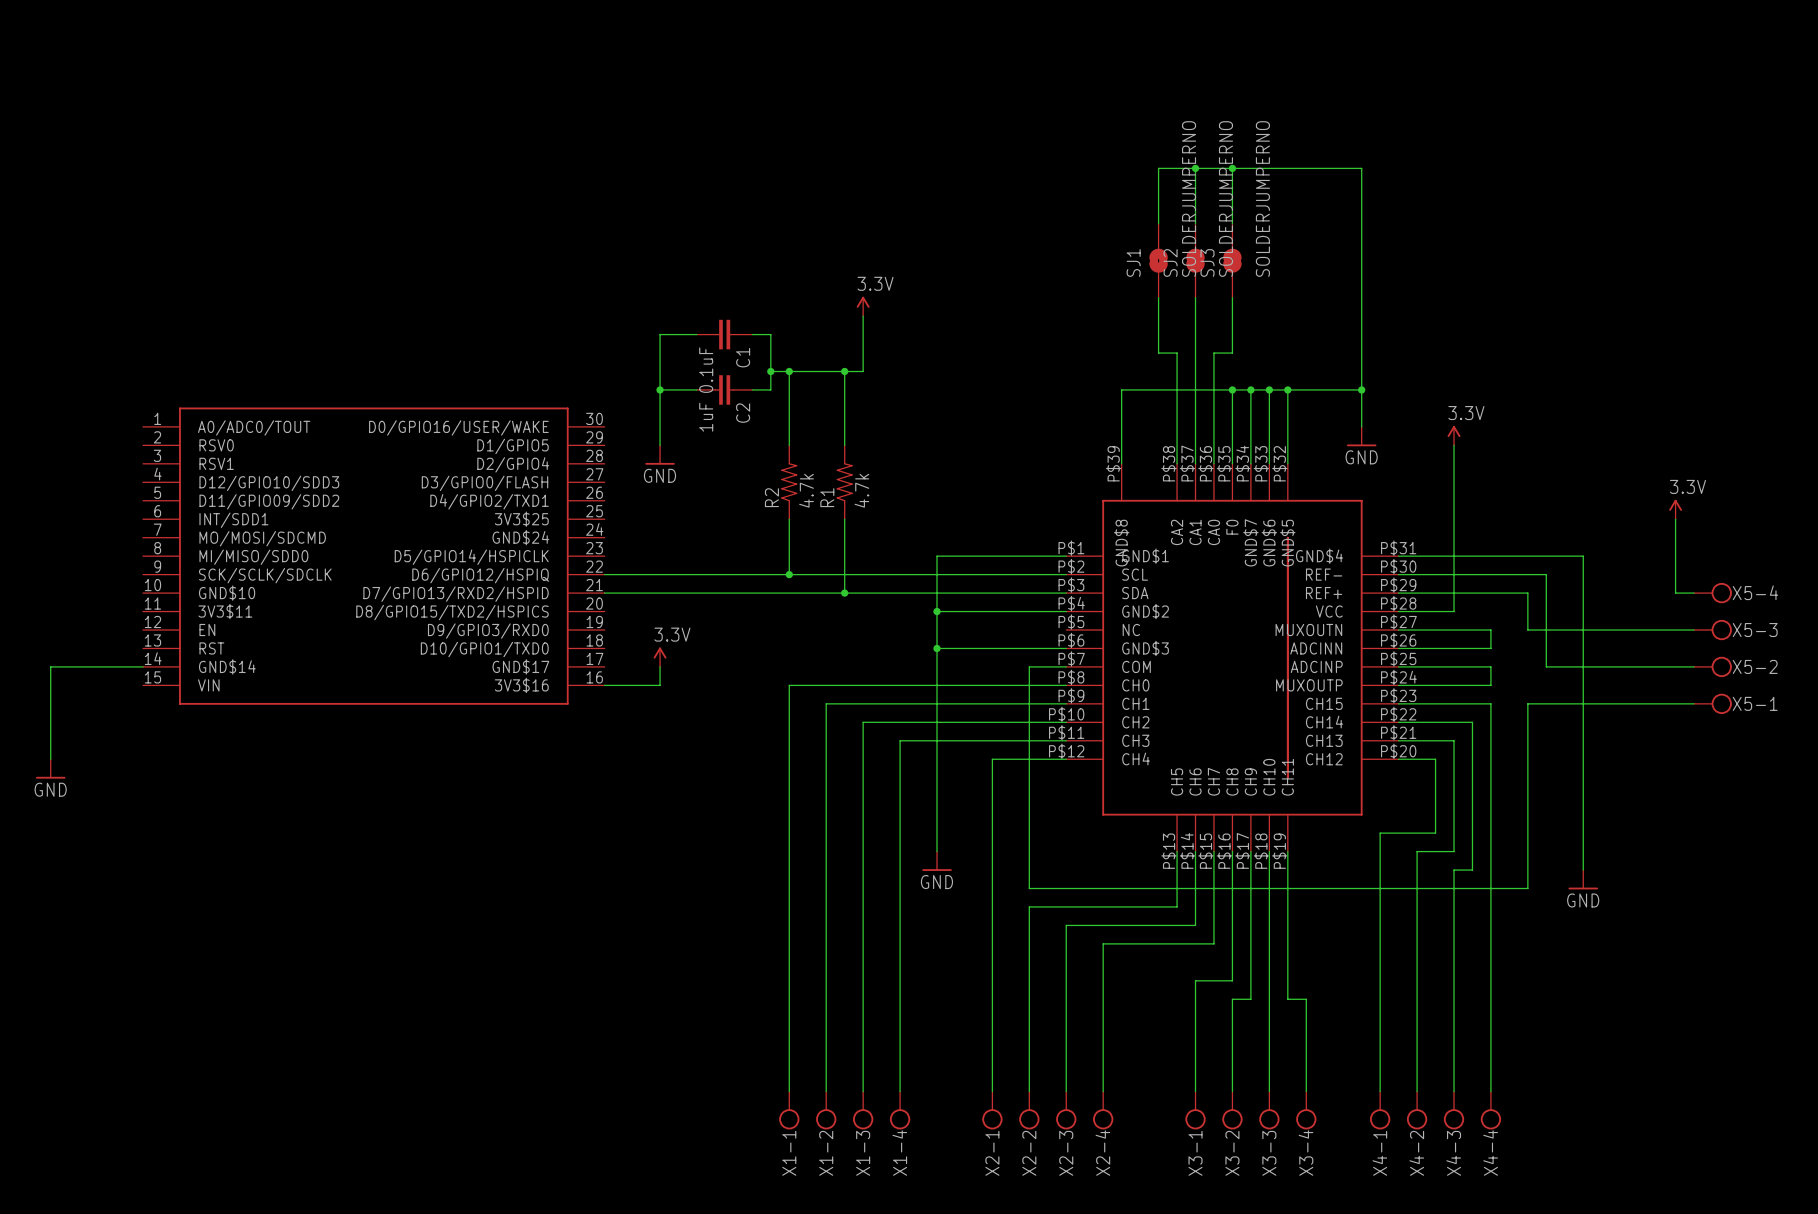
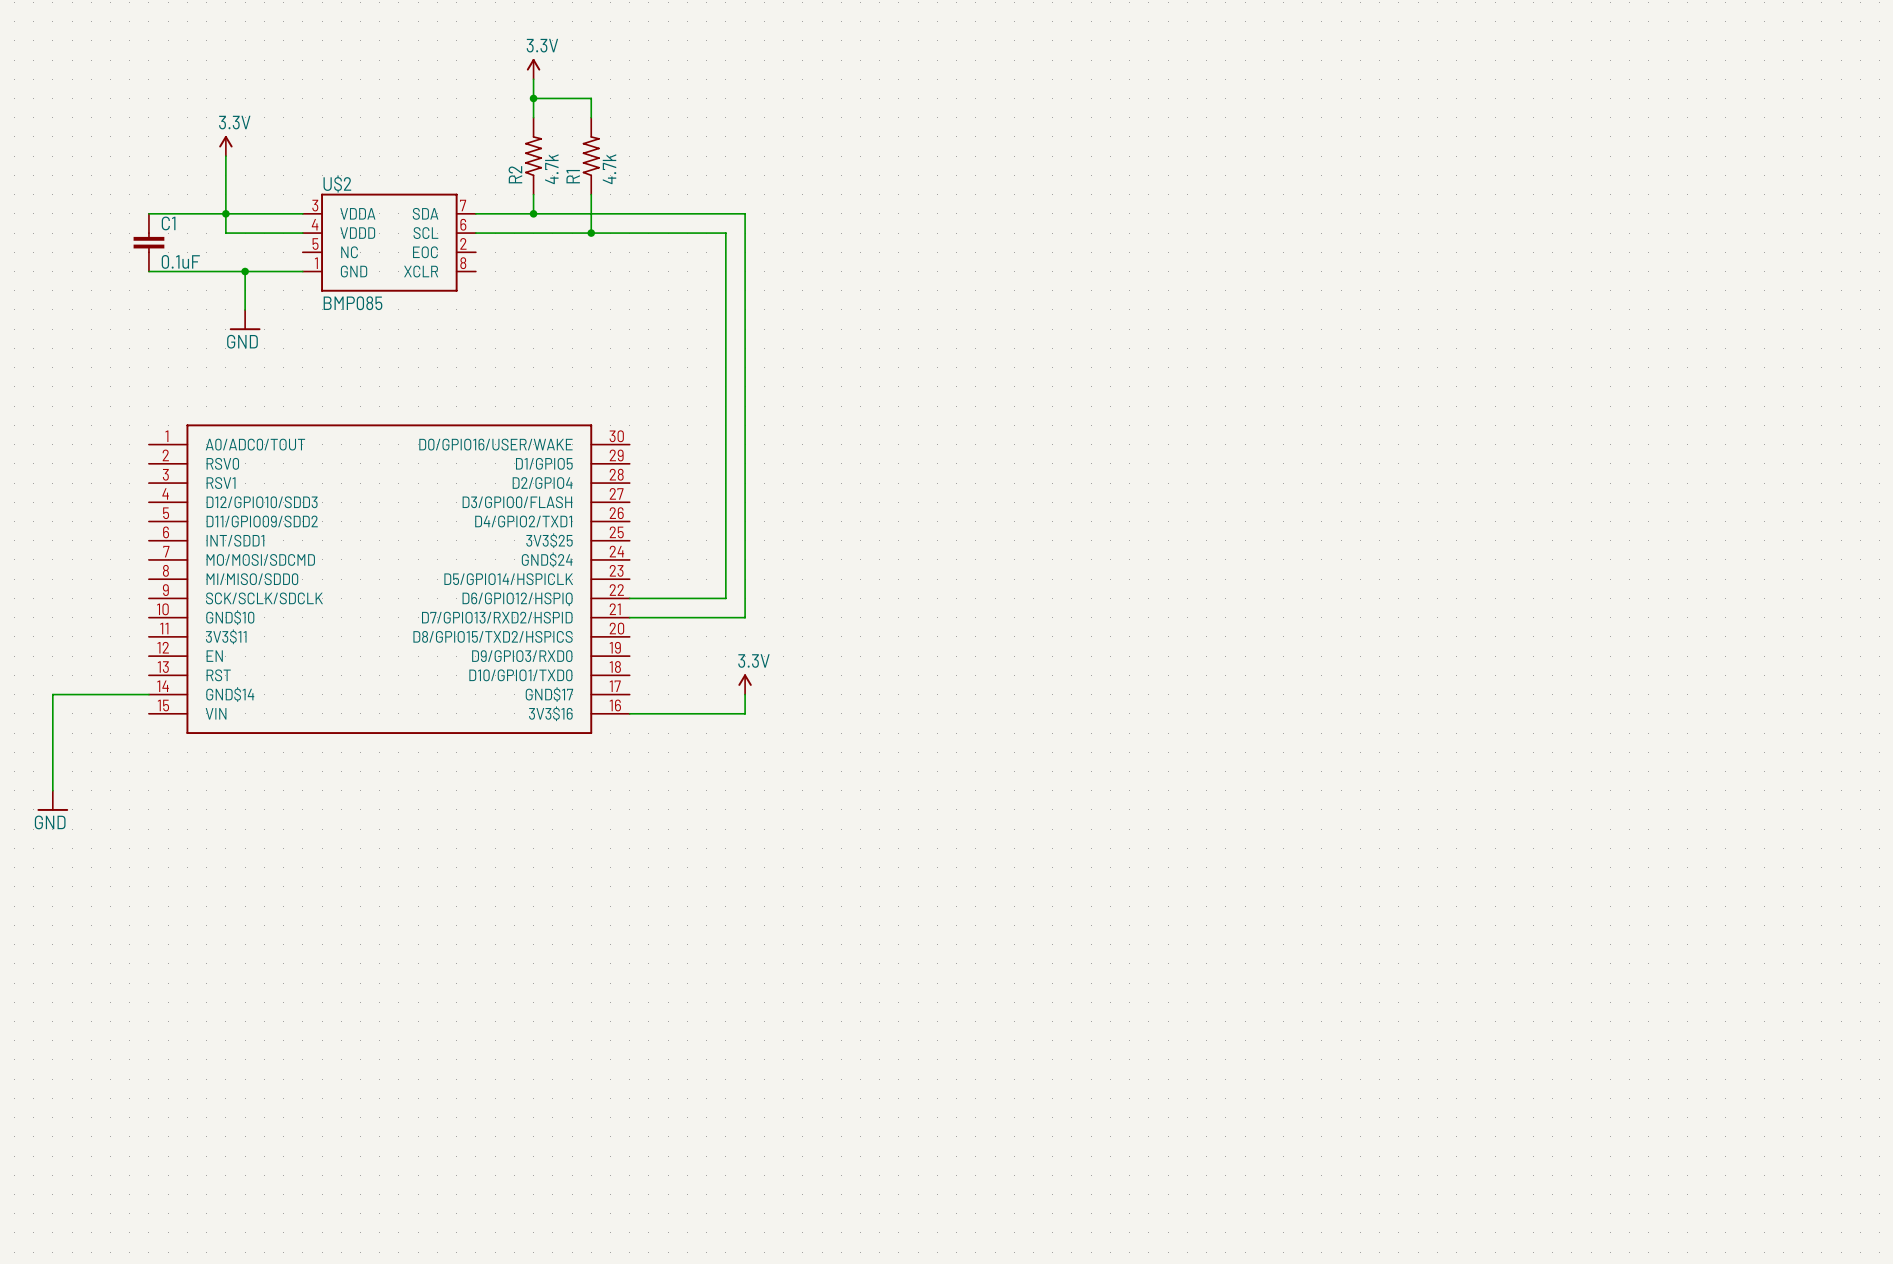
power symbol: none -> 3.3V (533, 69)
wire: none -> (533, 79) (533, 117)
wire: none -> (533, 98) (591, 98) (591, 117)
junction: none -> (533, 98)
power symbol: none -> 3.3V (225, 146)
wire: none -> (225, 156) (225, 233) (302, 233)
wire: (1195, 168) (1195, 223) -> none
junction: (1195, 168) -> none
wire: (1232, 168) (1232, 223) -> none
junction: (1232, 168) -> none
wire: none -> (533, 194) (533, 213)
wire: none -> (591, 194) (591, 233)
wire: none -> (148, 213) (302, 213)
junction: none -> (225, 213)
junction: none -> (533, 213)
junction: none -> (591, 233)
wire: (1158, 223) (1158, 168) (1361, 168) (1361, 426) -> none
U$2: none -> BMP085 (389, 242)
wire: none -> (148, 271) (302, 271)
wire: none -> (245, 271) (245, 309)
junction: none -> (245, 271)
SJ1: SOLDERJUMPERNO (1158, 260) -> none
SJ2: SOLDERJUMPERNO (1195, 260) -> none
SJ3: SOLDERJUMPERNO (1232, 260) -> none
wire: (1158, 297) (1158, 353) (1177, 353) (1177, 463) -> none
wire: (1195, 297) (1195, 463) -> none
wire: (1232, 297) (1232, 353) (1213, 353) (1213, 463) -> none
power symbol: 3.3V (863, 306) -> none
power symbol: none -> GND (245, 320)
wire: (863, 316) (863, 371) (770, 371) -> none
wire: (696, 334) (660, 334) (660, 445) -> none
C1 rotation: 0° (724, 334) -> 90° clockwise (148, 242)
C1 position: (724, 334) -> (148, 242)
wire: (752, 334) (770, 334) (770, 389) (752, 389) -> none
C1 name position: C1 (743, 357) -> C1 (168, 223)
C1 value position: 0.1uF (706, 370) -> 0.1uF (180, 261)
junction: (770, 371) -> none
wire: (789, 371) (789, 445) -> none
junction: (789, 371) -> none
wire: (844, 371) (844, 445) -> none
junction: (844, 371) -> none
wire: (660, 389) (696, 389) -> none
junction: (660, 389) -> none
C2: 1uF (724, 389) -> none
wire: (1232, 389) (1232, 463) -> none
junction: (1232, 389) -> none
wire: (1250, 389) (1250, 463) -> none
junction: (1250, 389) -> none
wire: (1269, 389) (1269, 463) -> none
junction: (1269, 389) -> none
wire: (1287, 389) (1287, 463) -> none
junction: (1287, 389) -> none
wire: (1361, 389) (1121, 389) (1121, 463) -> none
junction: (1361, 389) -> none
power symbol: 3.3V (1454, 435) -> none
power symbol: GND (1361, 436) -> none
wire: (1454, 445) (1454, 611) (1398, 611) -> none
power symbol: GND (660, 455) -> none
R2 position: (789, 482) -> (533, 156)
R1 position: (844, 482) -> (591, 156)
power symbol: 3.3V (1675, 509) -> none
wire: (789, 519) (789, 574) -> none
wire: (844, 519) (844, 593) -> none
wire: (1675, 519) (1675, 593) (1694, 593) -> none
wire: (1066, 556) (937, 556) (937, 851) -> none
wire: (1398, 556) (1583, 556) (1583, 870) -> none
wire: (696, 574) (1066, 574) -> (725, 598) (725, 233) (475, 233)
junction: (789, 574) -> none
wire: (1398, 574) (1546, 574) (1546, 666) (1694, 666) -> none
wire: (715, 593) (1066, 593) -> (745, 617) (745, 213) (475, 213)
junction: (844, 593) -> none
wire: (1398, 593) (1527, 593) (1527, 630) (1694, 630) -> none
X5-4: (1712, 593) -> none
wire: (937, 611) (1066, 611) -> none
junction: (937, 611) -> none
wire: (1398, 630) (1490, 630) (1490, 648) (1398, 648) -> none
X5-3: (1712, 630) -> none
wire: (937, 648) (1066, 648) -> none
junction: (937, 648) -> none
power symbol position: 3.3V (660, 657) -> 3.3V (745, 684)
part: (1232, 657) -> none
wire: (660, 666) (660, 685) -> (745, 694) (745, 713) (687, 713)
wire: (1066, 666) (1029, 666) (1029, 888) (1527, 888) (1527, 703) (1694, 703) -> none
wire: (1398, 666) (1490, 666) (1490, 685) (1398, 685) -> none
X5-2: (1712, 666) -> none
wire: (1066, 685) (789, 685) (789, 1091) -> none
wire: (1066, 703) (826, 703) (826, 1091) -> none
wire: (1398, 703) (1490, 703) (1490, 1091) -> none
X5-1: (1712, 703) -> none
wire: (1066, 722) (863, 722) (863, 1091) -> none
wire: (1398, 722) (1472, 722) (1472, 870) (1454, 870) (1454, 1091) -> none
wire: (1066, 740) (900, 740) (900, 1091) -> none
wire: (1398, 740) (1454, 740) (1454, 851) (1417, 851) (1417, 1091) -> none
wire: (1066, 759) (992, 759) (992, 1091) -> none
wire: (1398, 759) (1435, 759) (1435, 833) (1380, 833) (1380, 1091) -> none
wire: (1177, 851) (1177, 906) (1029, 906) (1029, 1091) -> none
wire: (1195, 851) (1195, 925) (1066, 925) (1066, 1091) -> none
wire: (1213, 851) (1213, 943) (1103, 943) (1103, 1091) -> none
wire: (1232, 851) (1232, 980) (1195, 980) (1195, 1091) -> none
wire: (1250, 851) (1250, 999) (1232, 999) (1232, 1091) -> none
wire: (1269, 851) (1269, 1091) -> none
wire: (1287, 851) (1287, 999) (1306, 999) (1306, 1091) -> none
power symbol: GND (937, 861) -> none
power symbol: GND (1583, 879) -> none
X1-1: (789, 1110) -> none
X1-2: (826, 1110) -> none
X1-3: (863, 1110) -> none
X1-4: (900, 1110) -> none
X2-1: (992, 1110) -> none
X2-2: (1029, 1110) -> none
X2-3: (1066, 1110) -> none
X2-4: (1103, 1110) -> none
X3-1: (1195, 1110) -> none
X3-2: (1232, 1110) -> none
X3-3: (1269, 1110) -> none
X3-4: (1306, 1110) -> none
X4-1: (1380, 1110) -> none
X4-2: (1417, 1110) -> none
X4-3: (1454, 1110) -> none
X4-4: (1490, 1110) -> none

